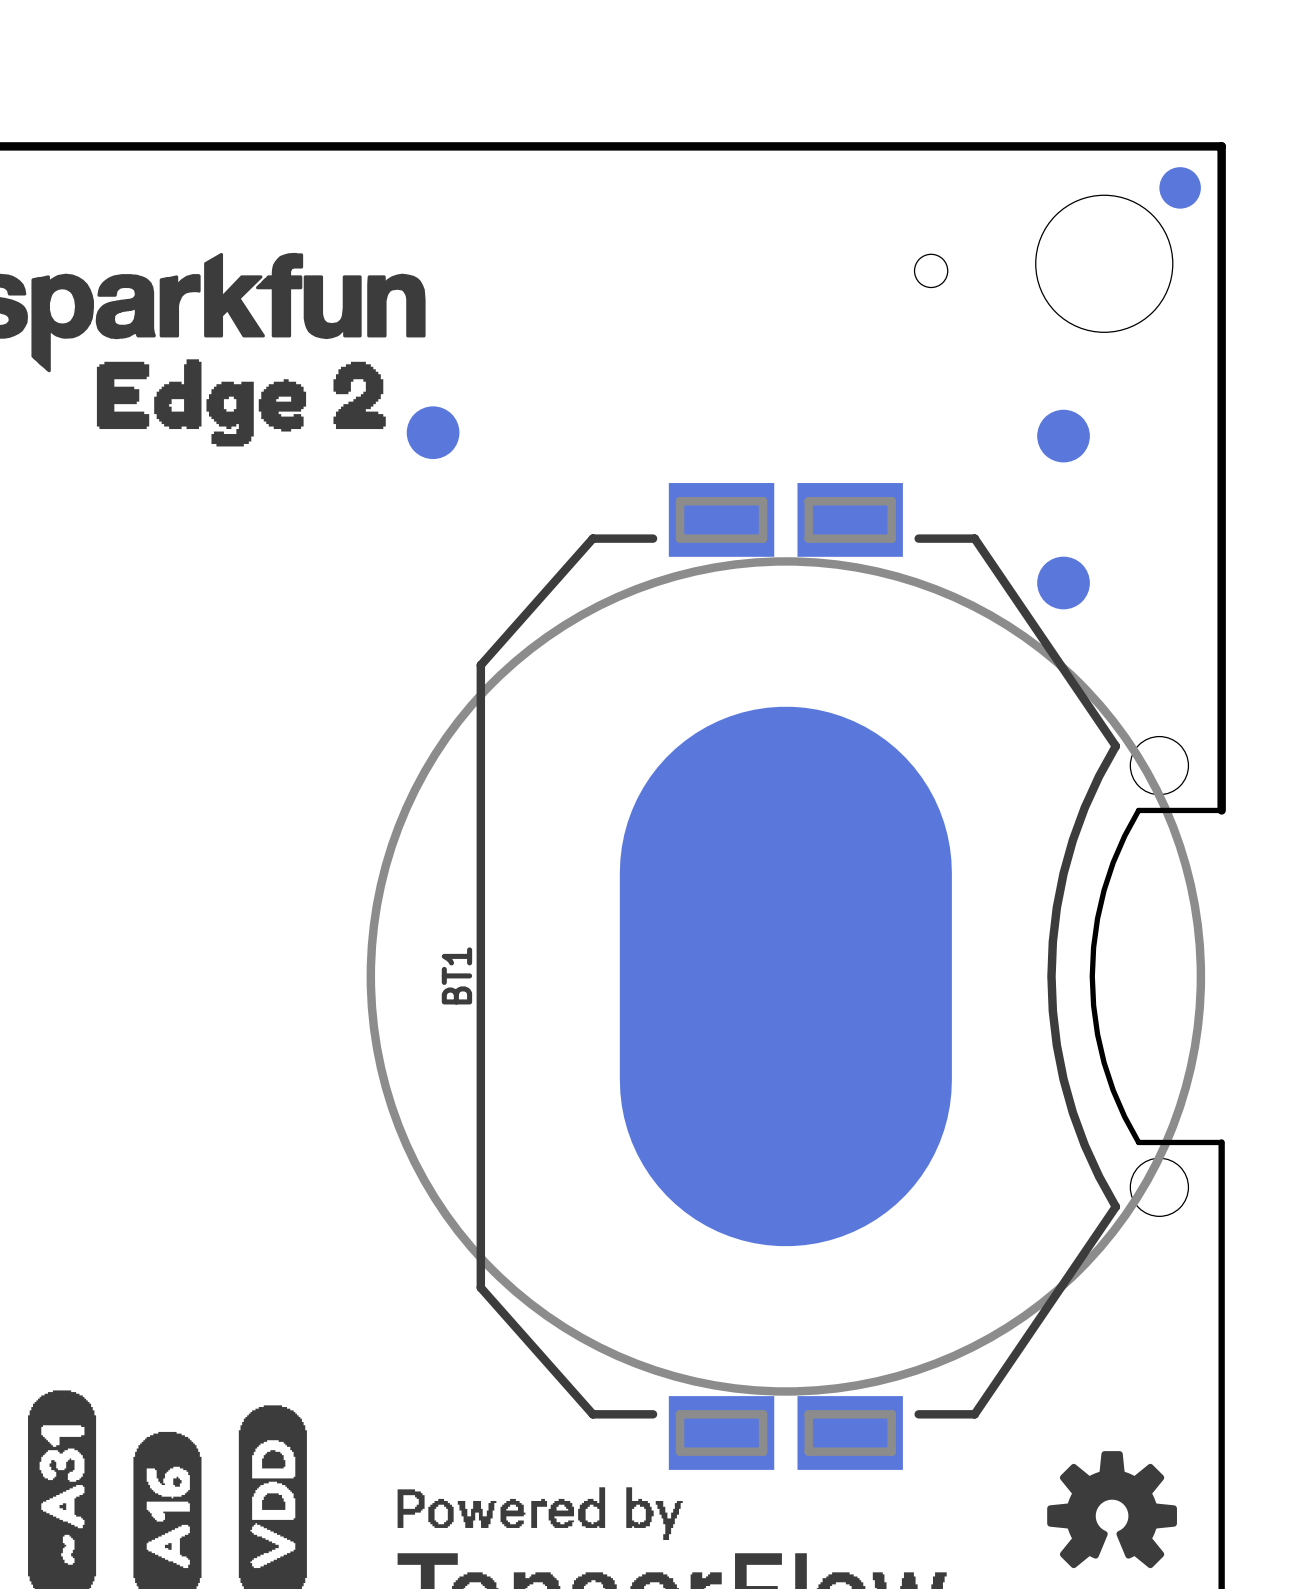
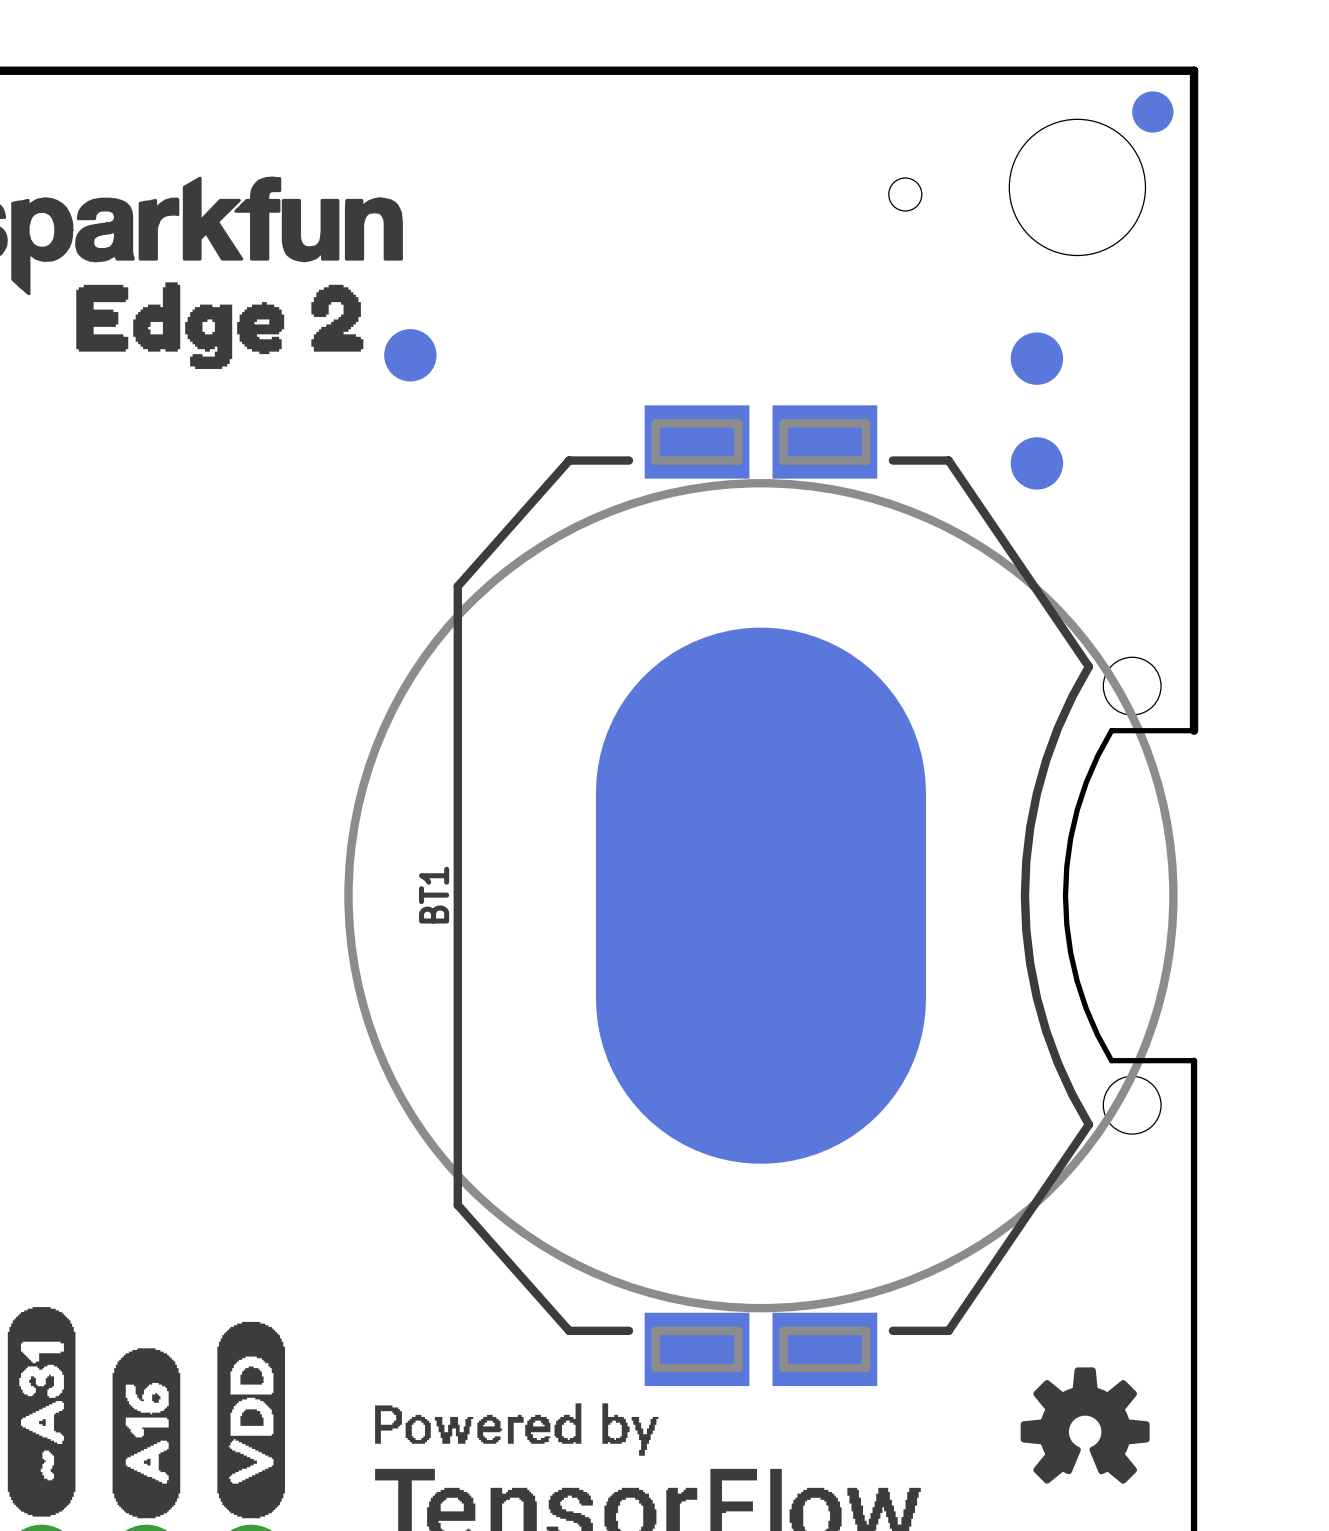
part position: (1063, 583) -> (1036, 463)

